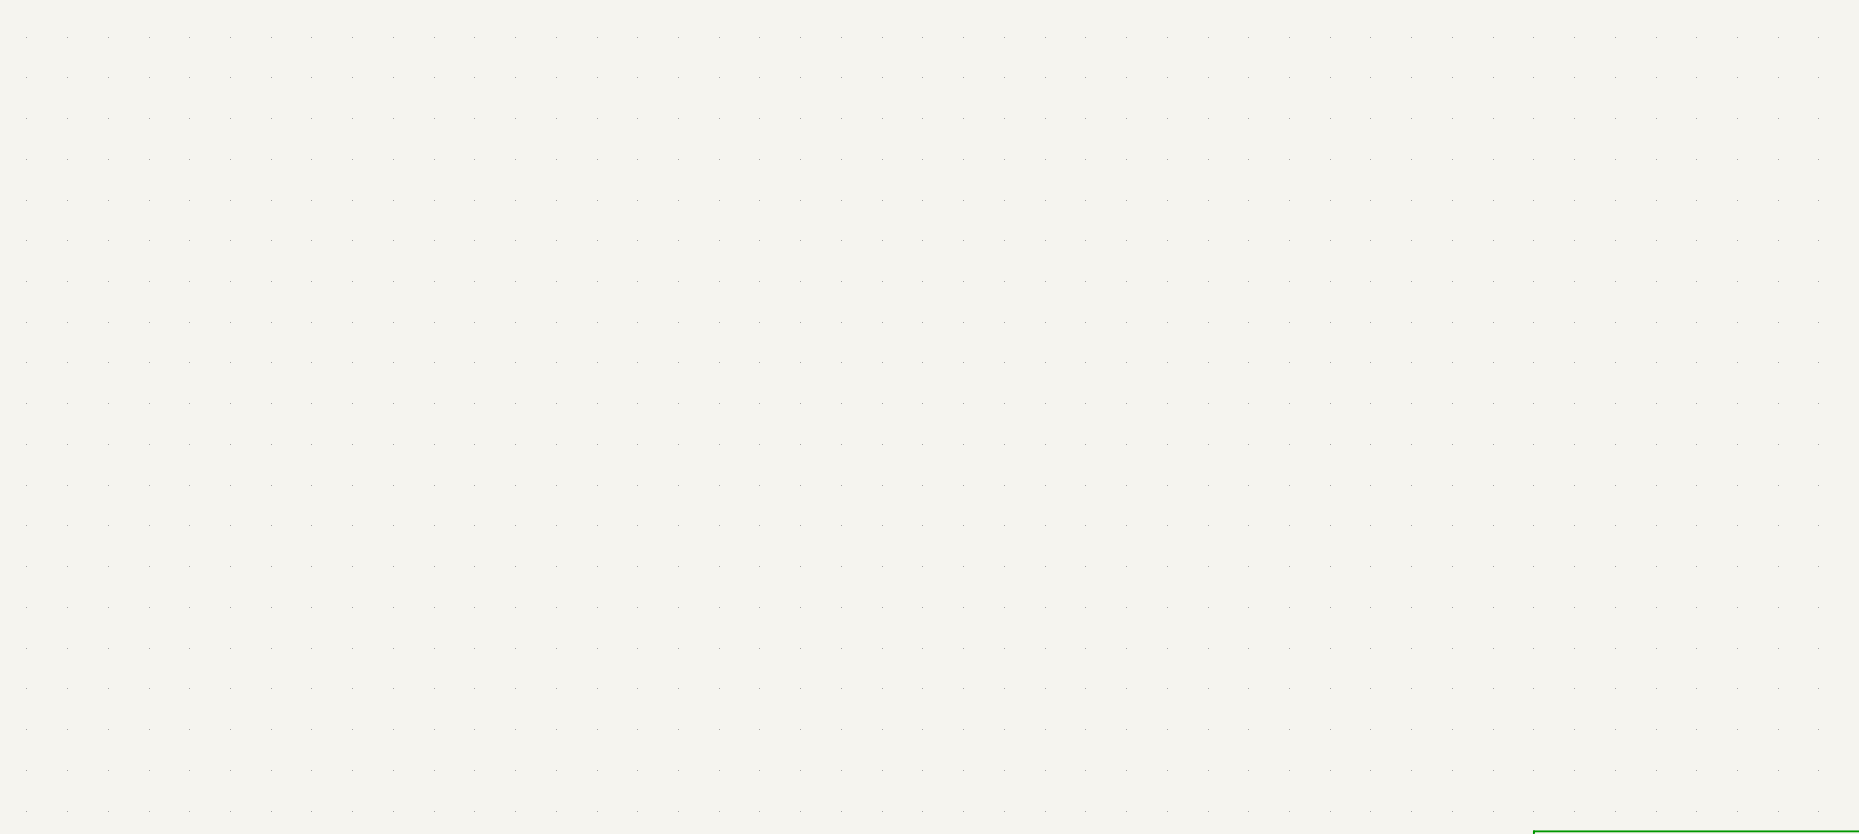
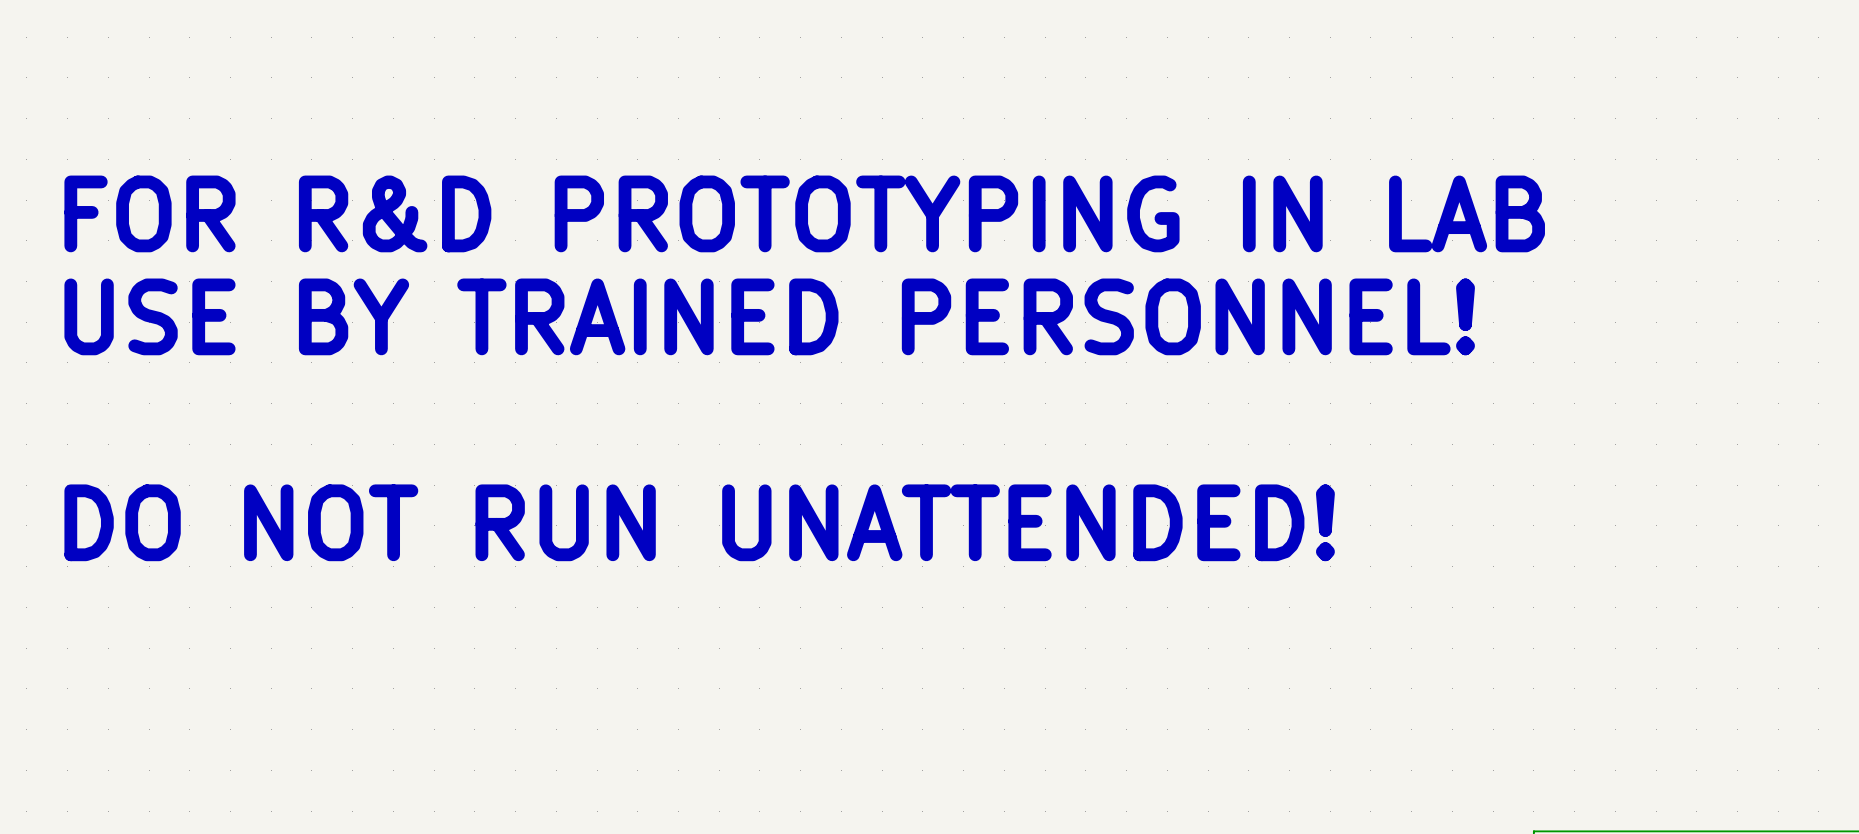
text: none -> FOR R&D PROTOTYPING IN LAB (804, 213)
text: none -> USE BY TRAINED PERSONNEL! (769, 316)
text: none -> DO NOT RUN UNATTENDED! (699, 522)

